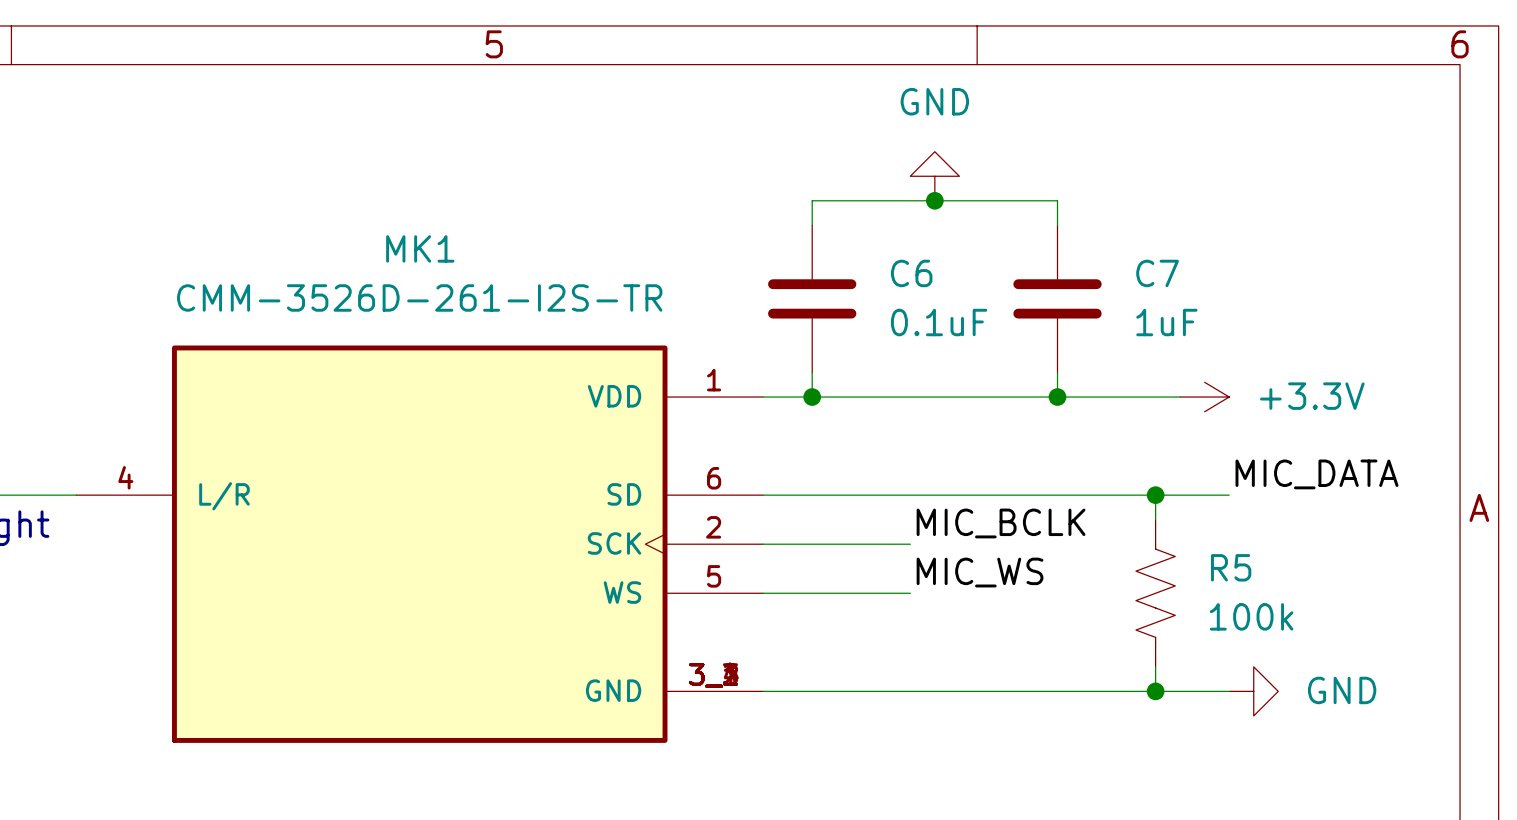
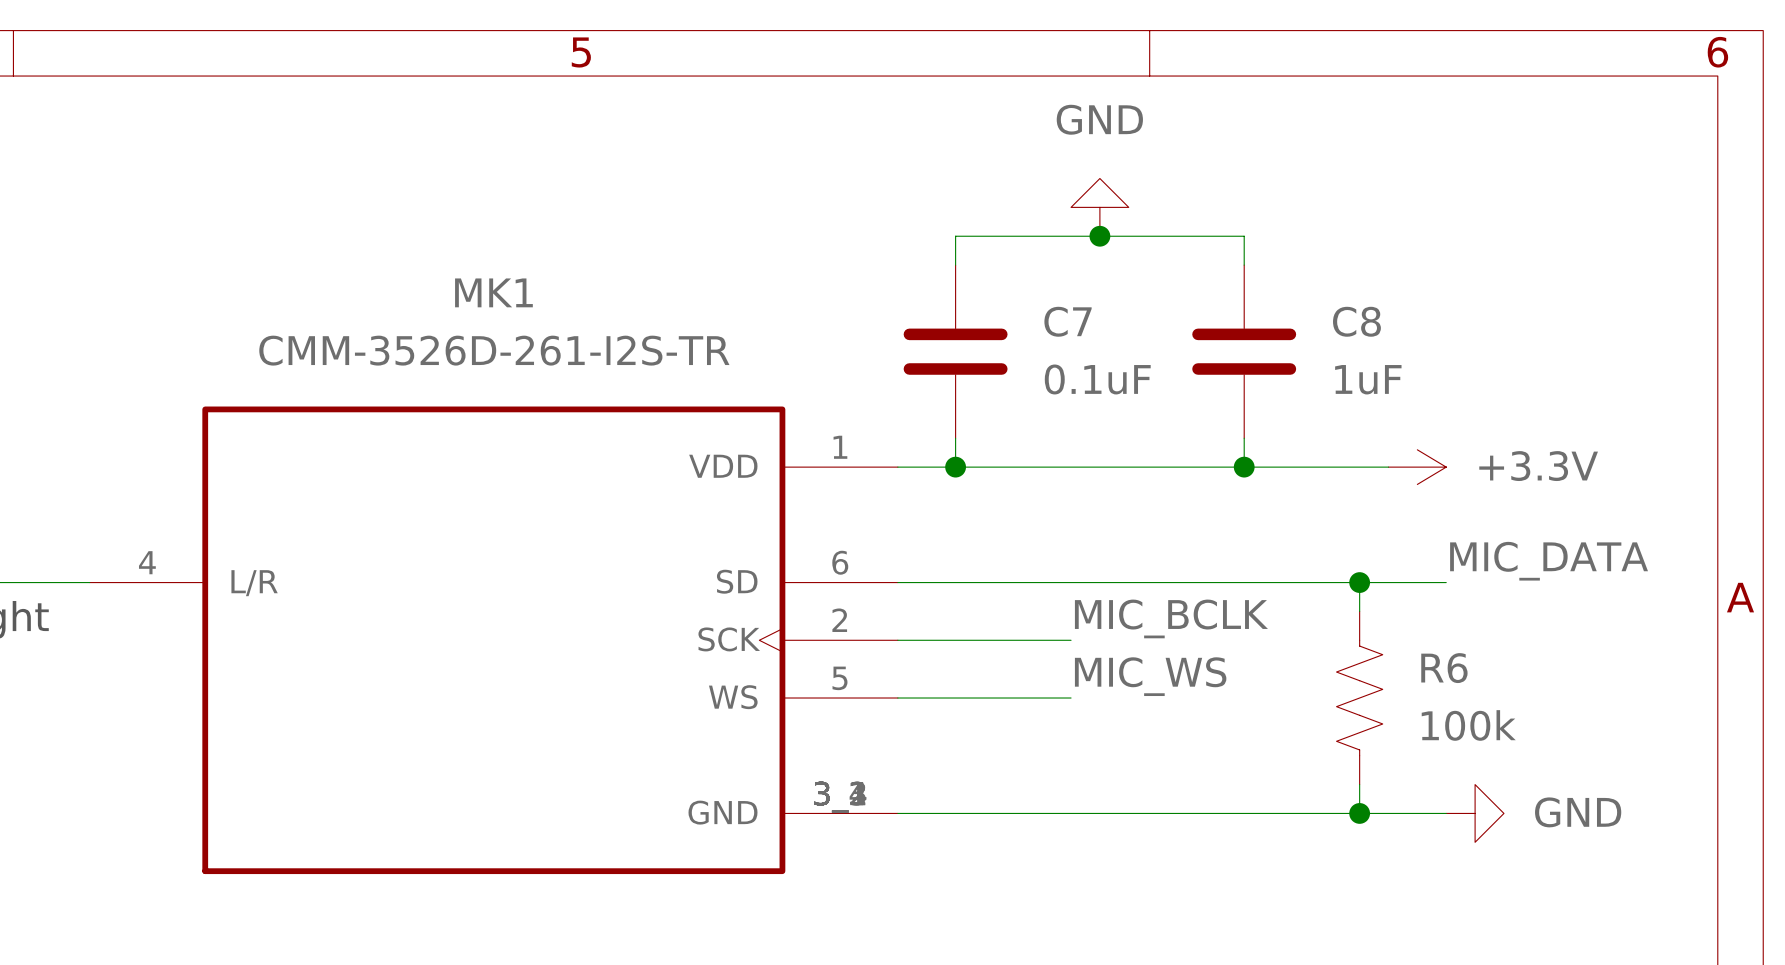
C6 name: C6 (911, 273) -> C7 (1068, 321)
C7 name: C7 (1157, 273) -> C8 (1356, 321)
R5 name: R5 (1231, 567) -> R6 (1444, 668)

